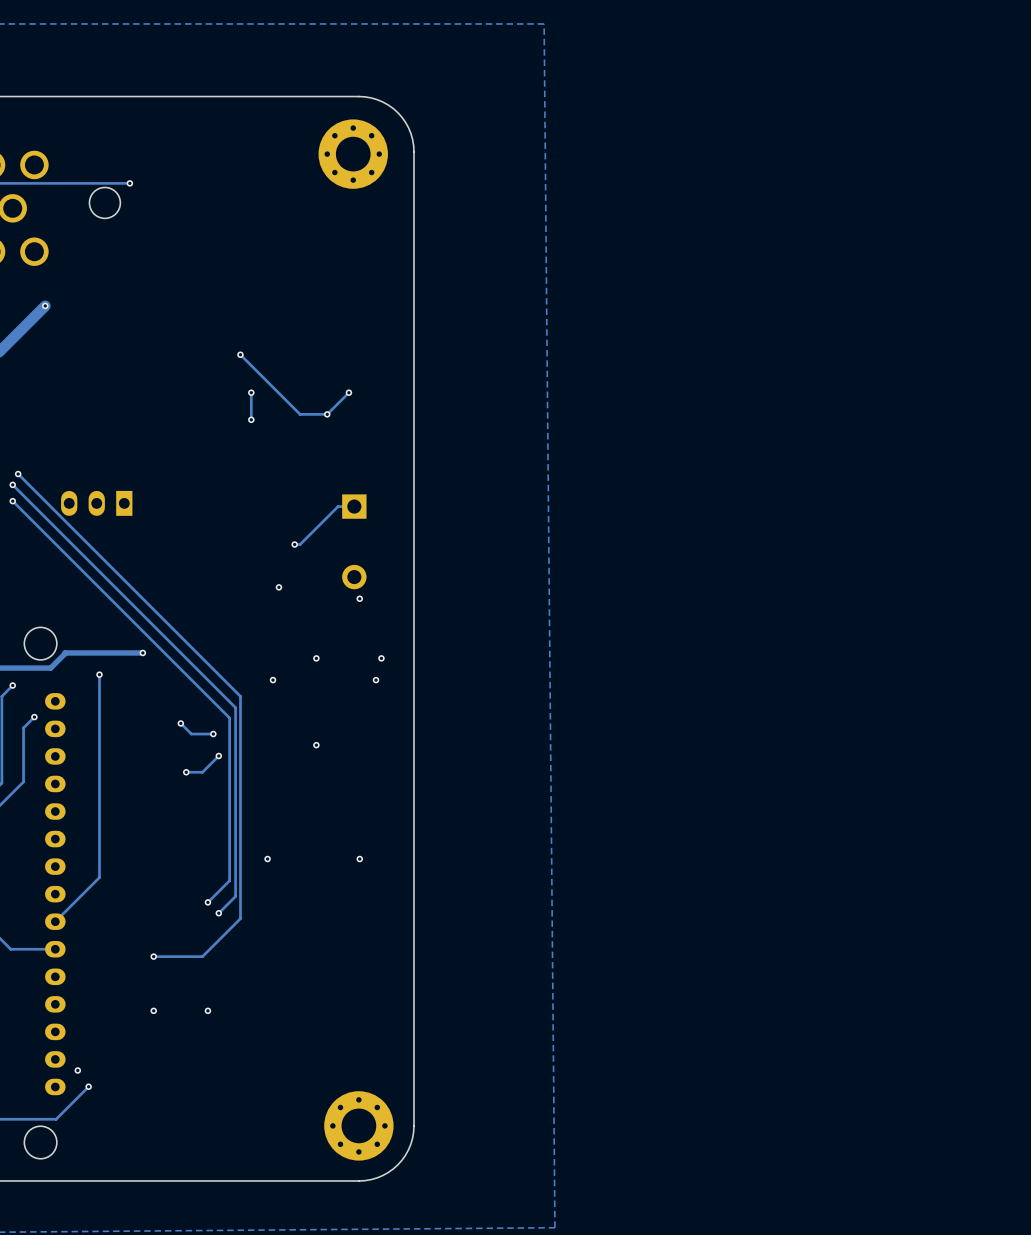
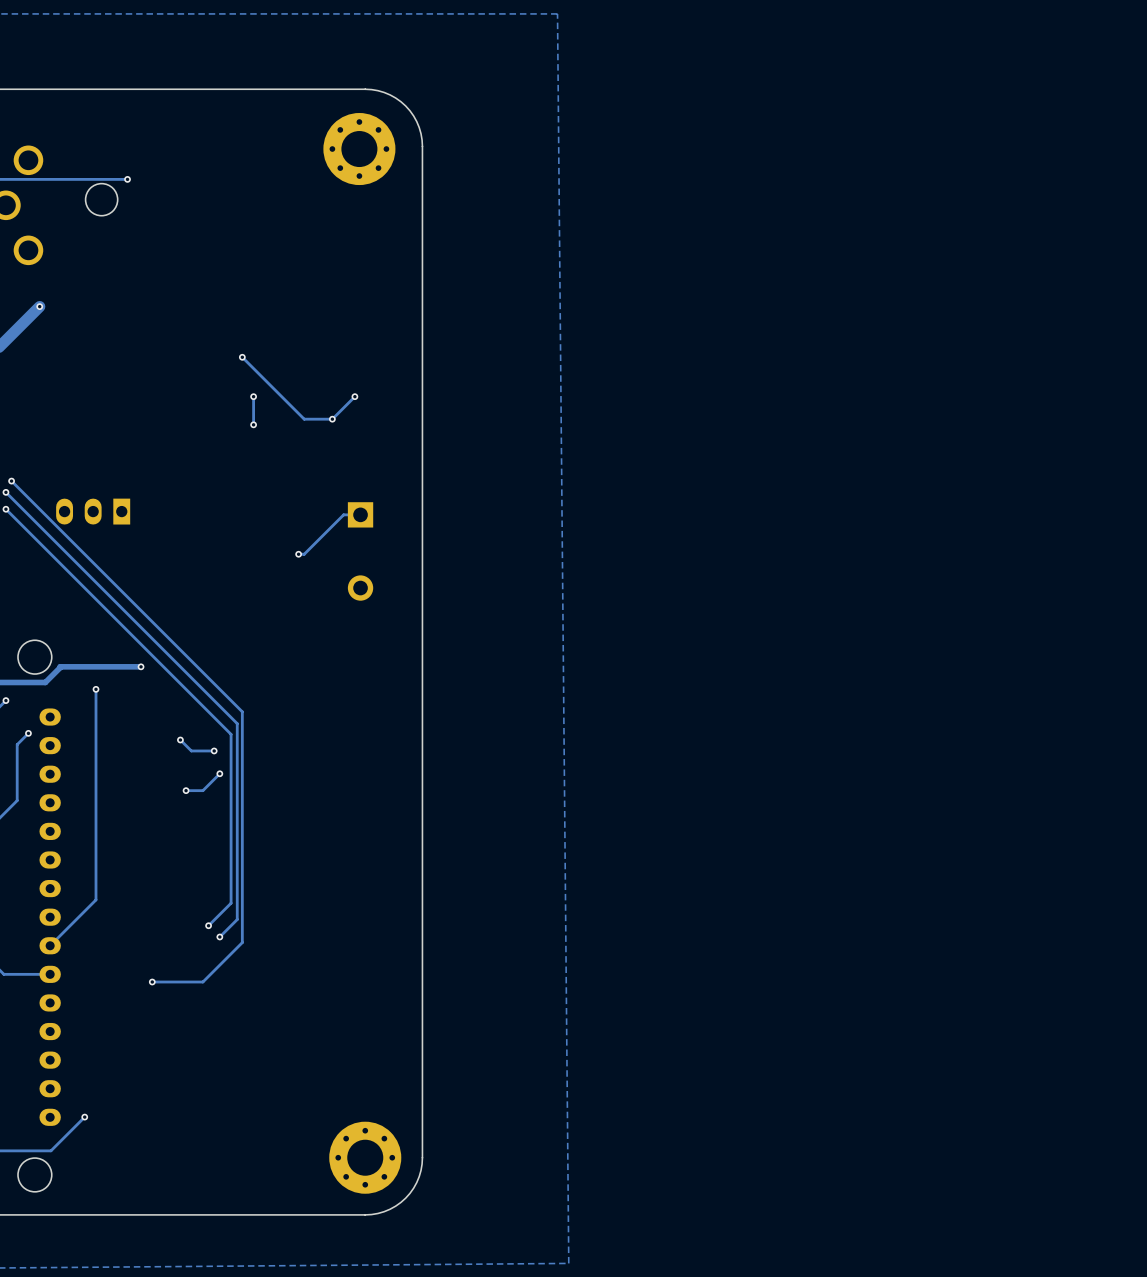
via: (278, 587) -> none
via: (359, 598) -> none
via: (316, 658) -> none
via: (381, 658) -> none
via: (273, 680) -> none
via: (376, 680) -> none
via: (316, 745) -> none
via: (267, 859) -> none
via: (359, 859) -> none
via: (153, 1010) -> none
via: (207, 1010) -> none
via: (77, 1070) -> none

